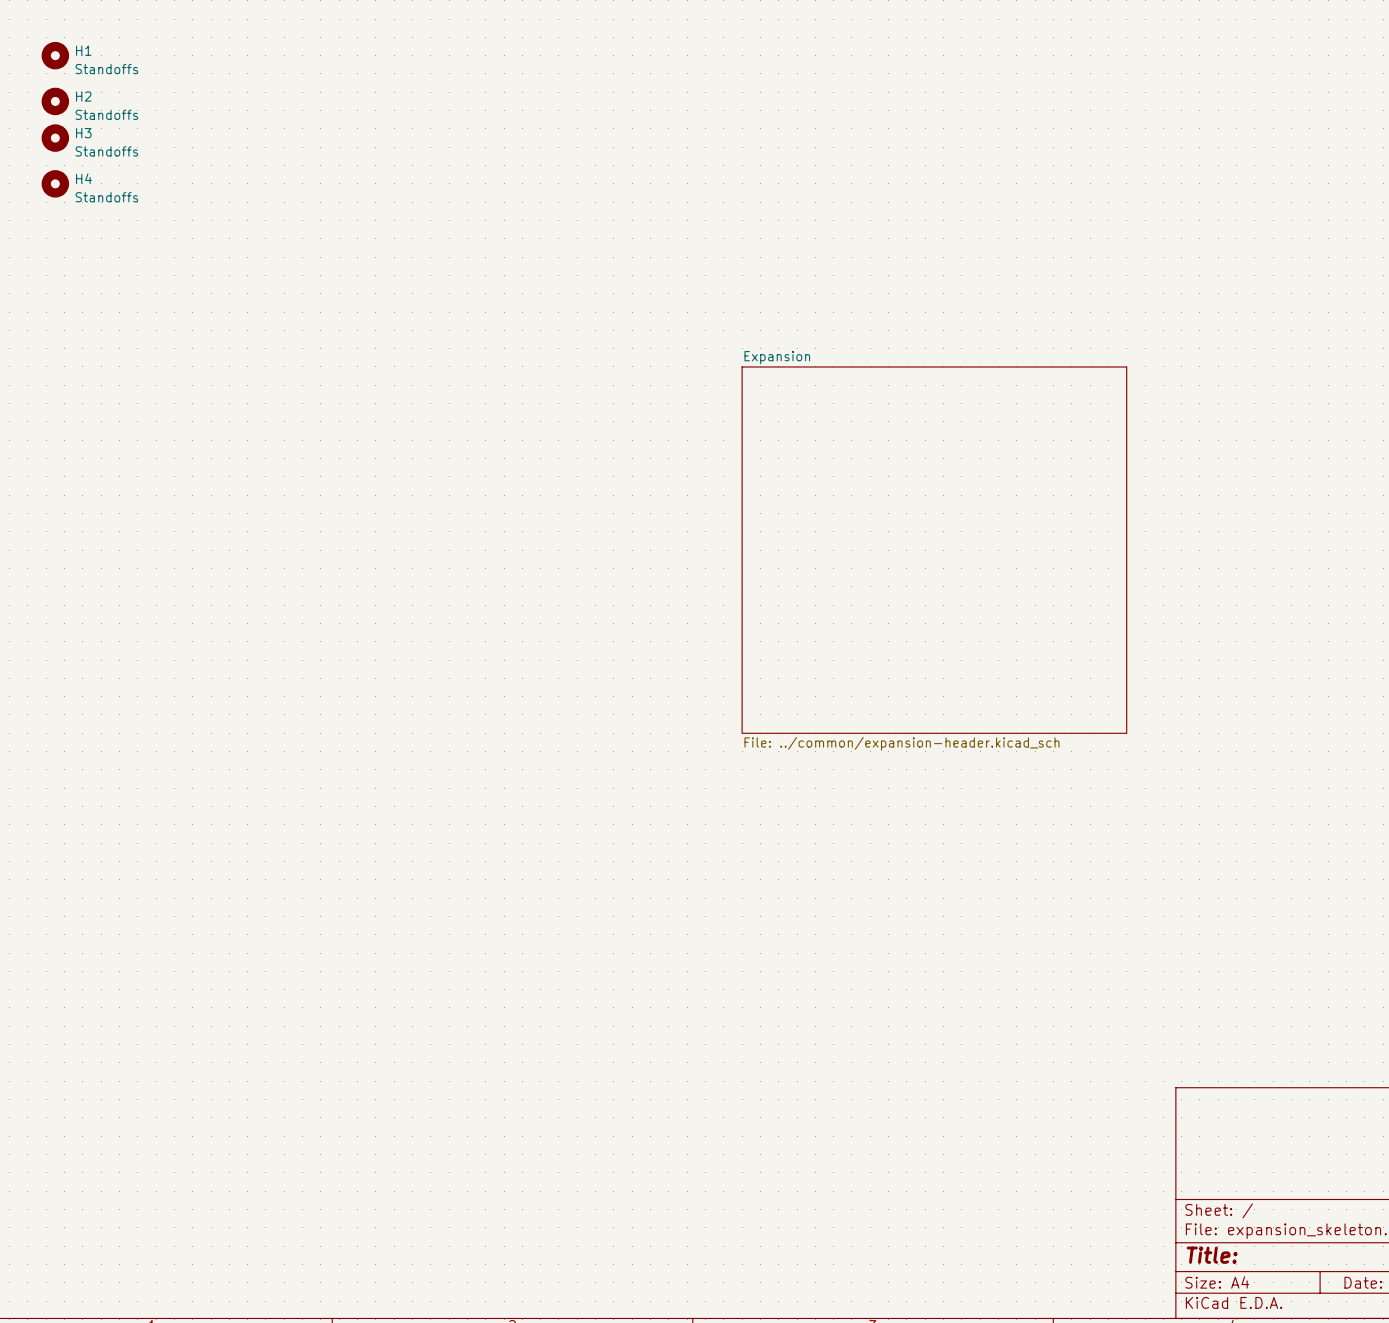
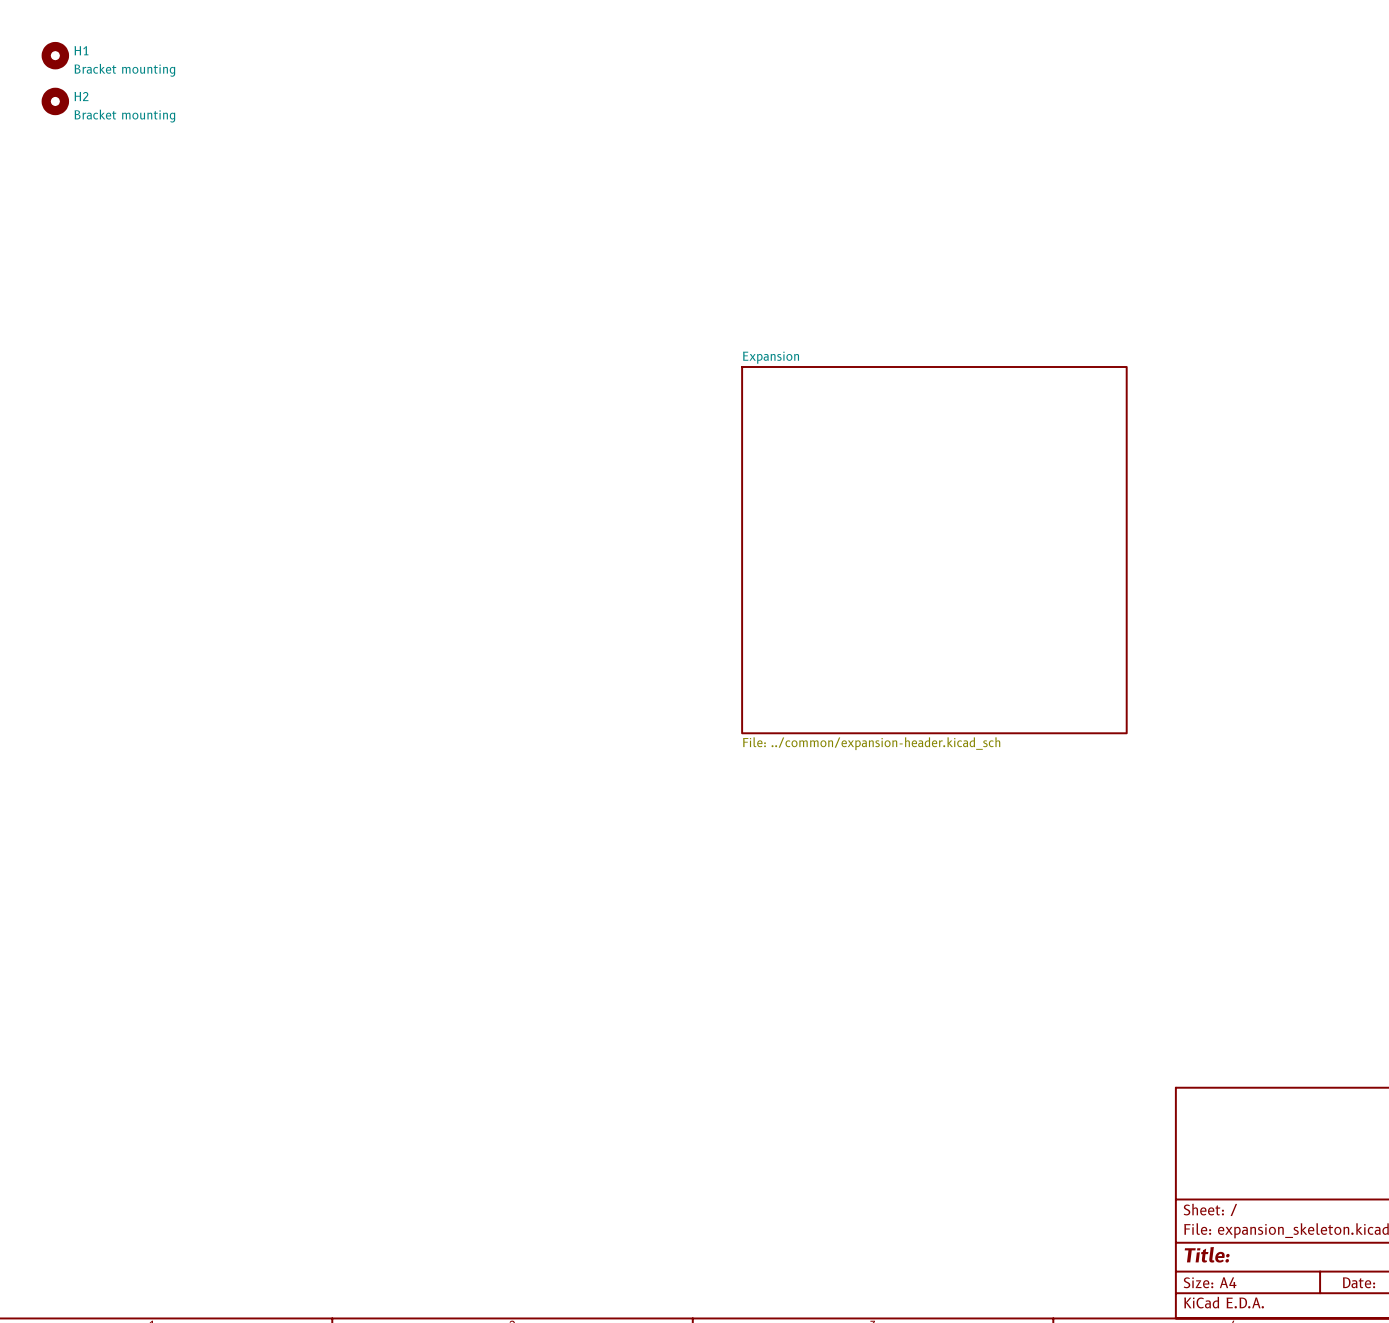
H1 value: Standoffs (106, 69) -> Bracket mounting (124, 70)
H2 value: Standoffs (106, 114) -> Bracket mounting (124, 116)
H3: Standoffs (55, 138) -> none
H4: Standoffs (55, 183) -> none

